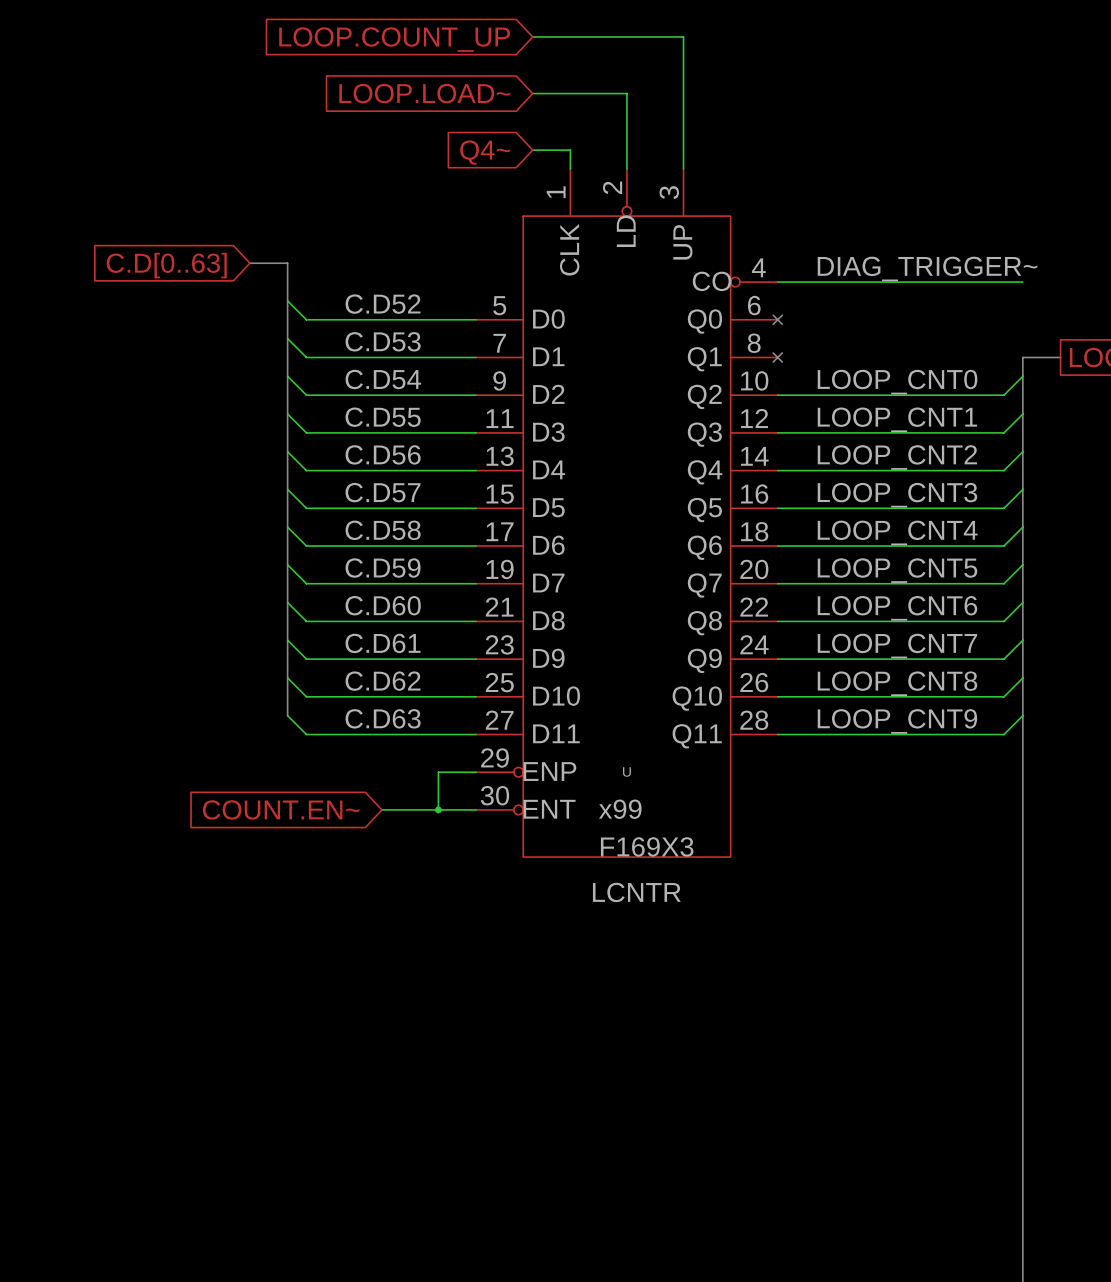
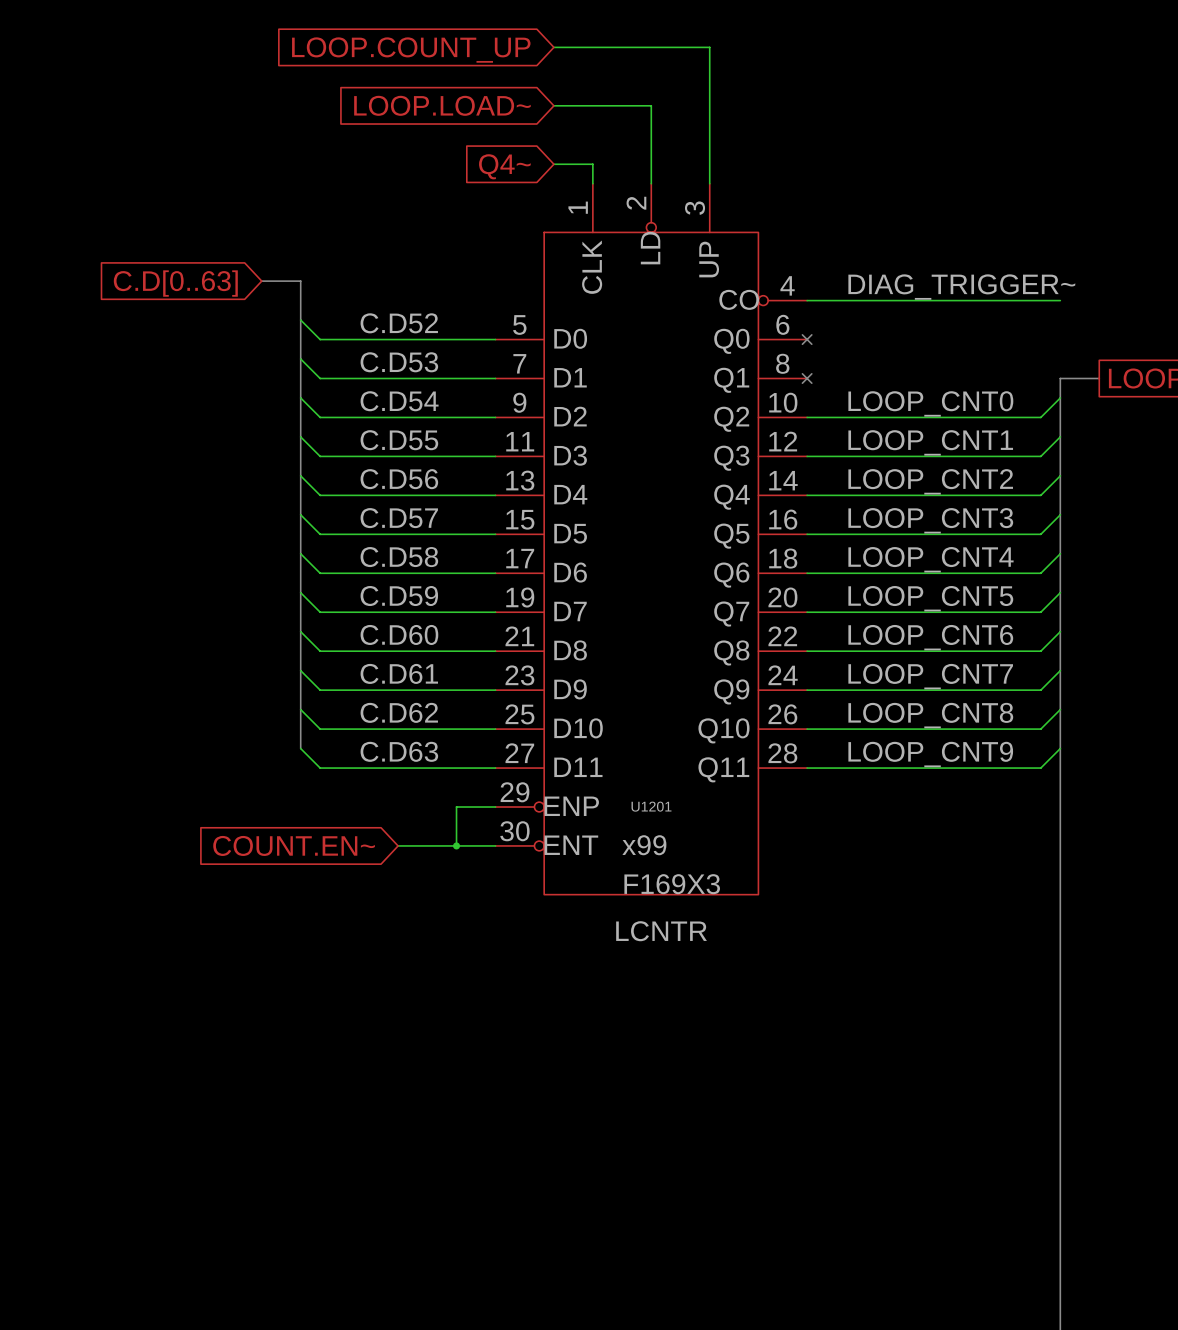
U name: U (626, 771) -> U1201 (651, 806)

